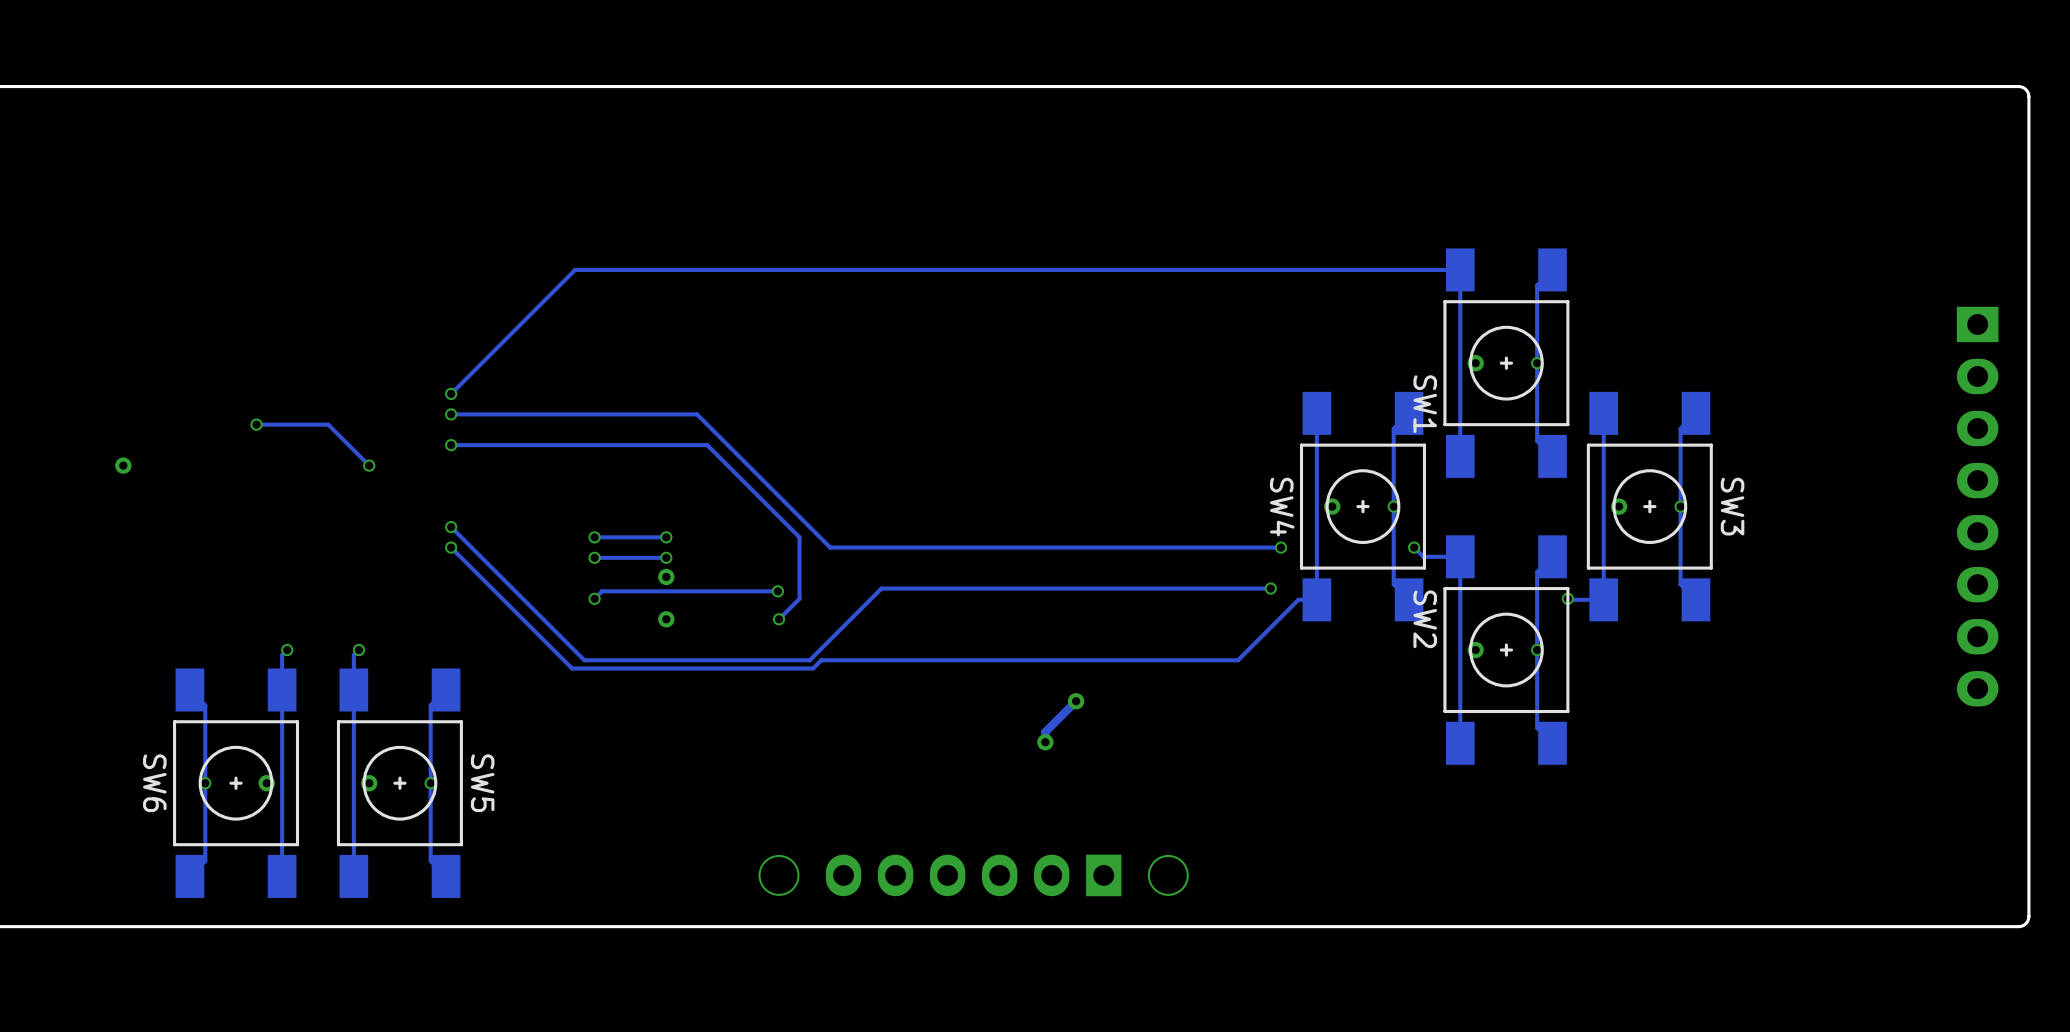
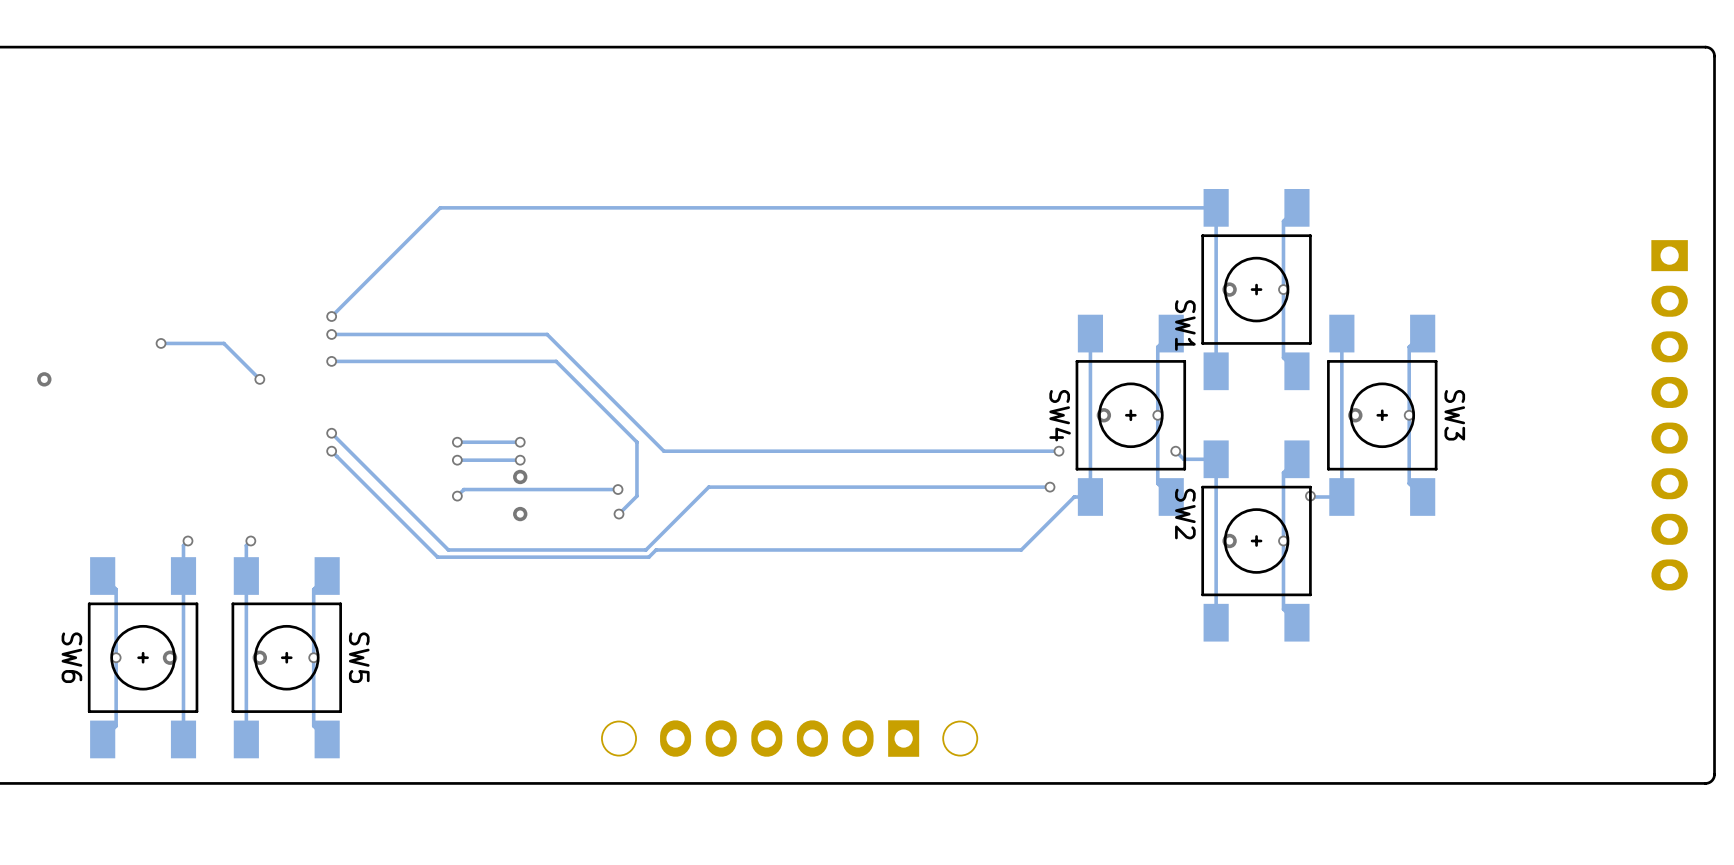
track: (1076, 701) (1045, 731) (1045, 742) -> none
via: (1076, 701) -> none
via: (1045, 742) -> none

